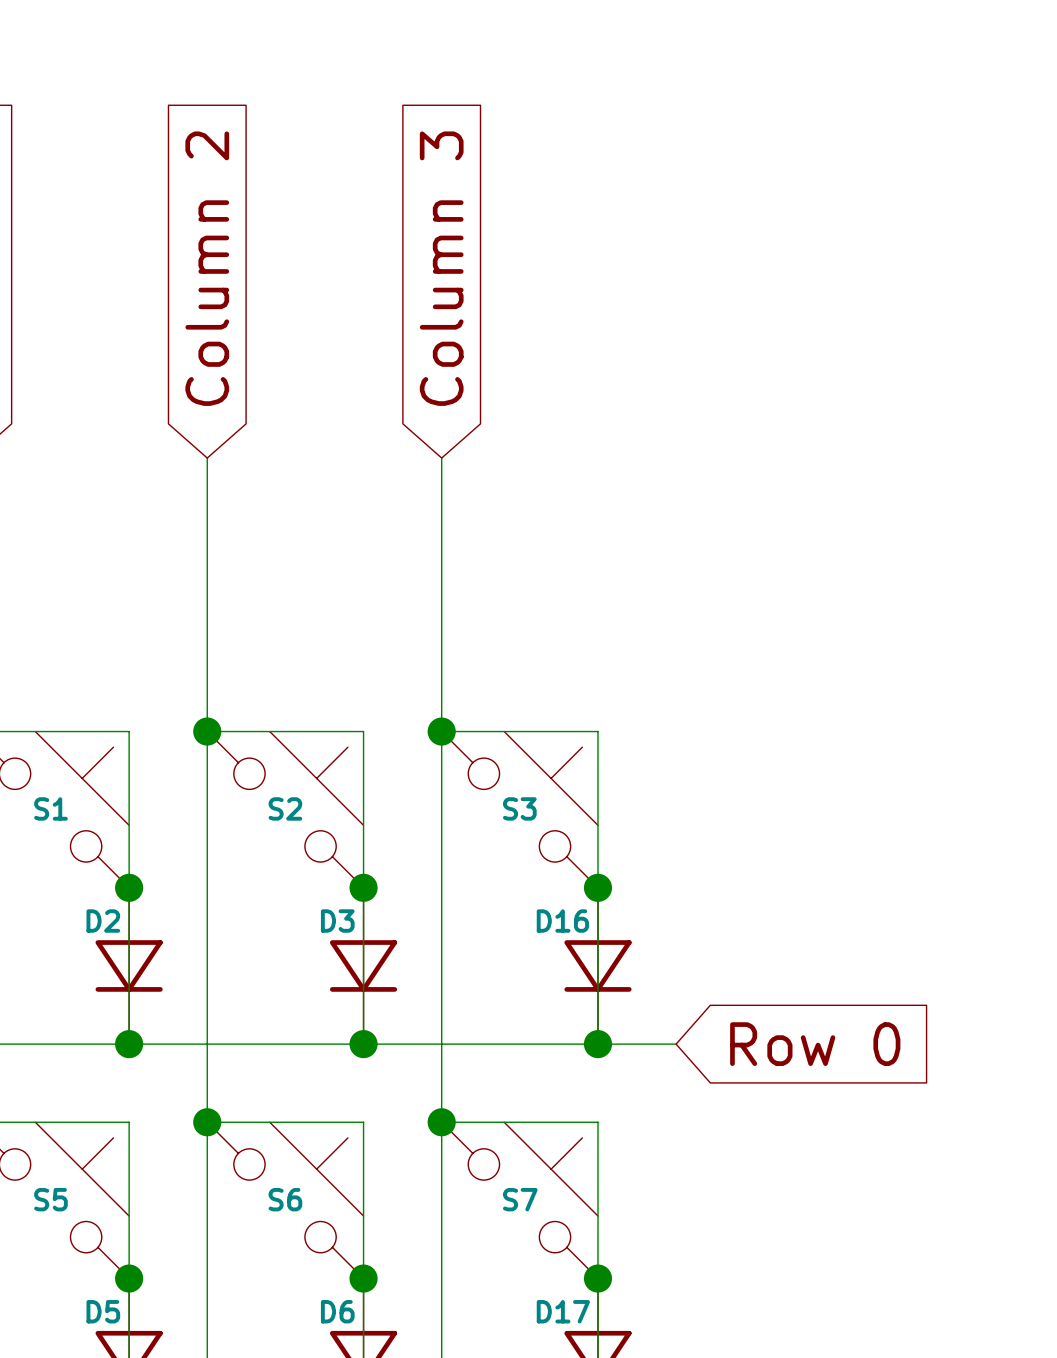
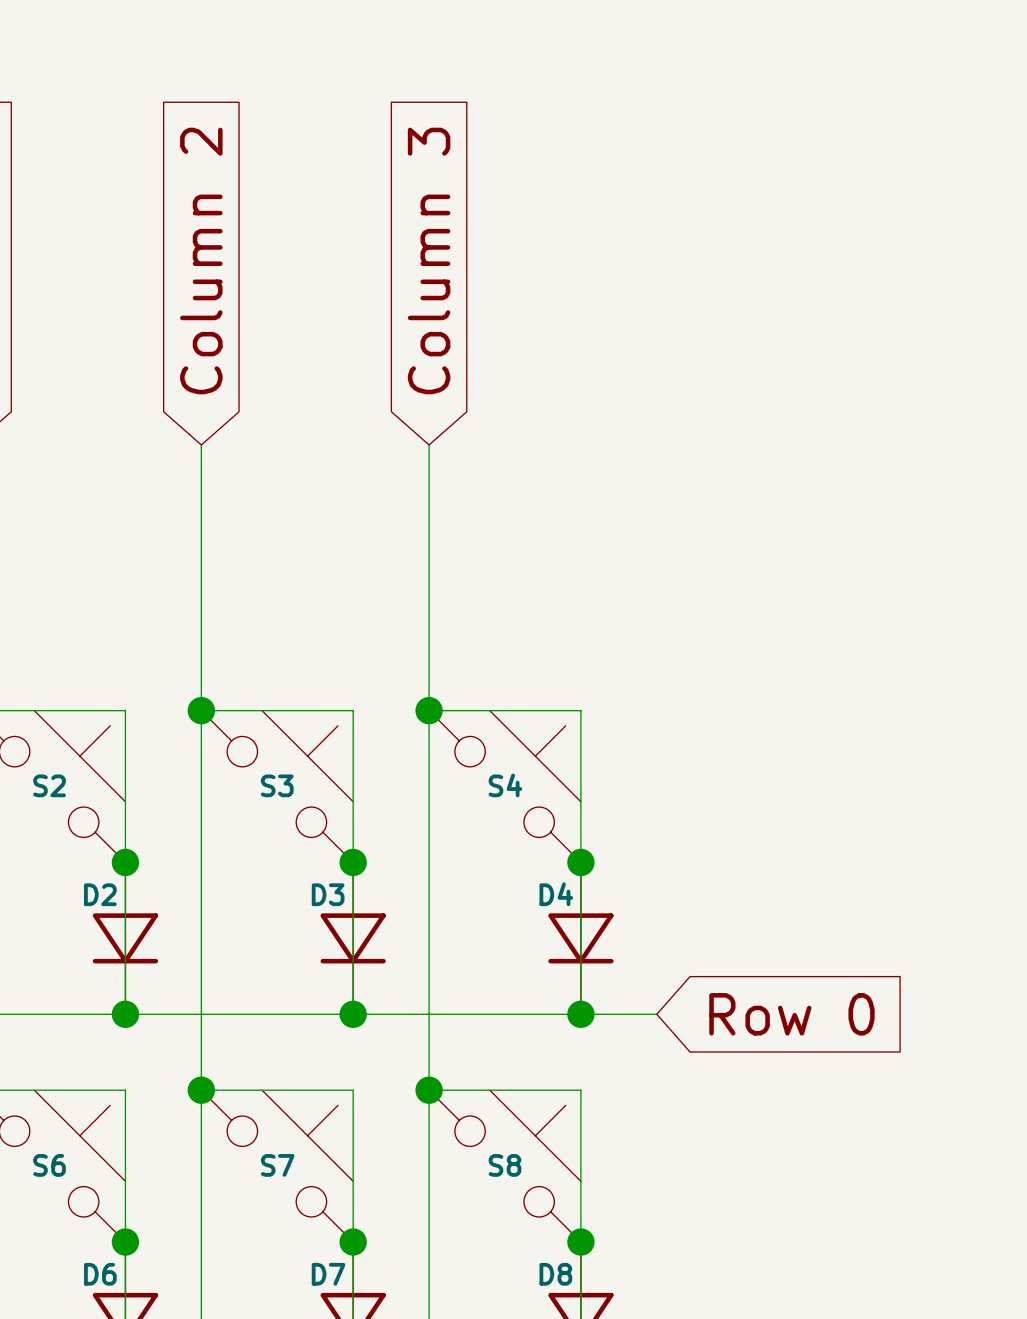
S1 name: S1 (50, 808) -> S2 (49, 785)
S2 name: S2 (285, 808) -> S3 (277, 785)
S3 name: S3 (519, 808) -> S4 (505, 785)
D16 name: D16 (562, 921) -> D4 (556, 894)
S5 name: S5 (50, 1199) -> S6 (49, 1165)
S6 name: S6 (285, 1199) -> S7 (277, 1165)
S7 name: S7 (520, 1199) -> S8 (504, 1165)
D5 name: D5 (103, 1311) -> D6 (100, 1274)
D6 name: D6 (337, 1311) -> D7 (328, 1274)
D17 name: D17 (563, 1311) -> D8 (555, 1274)

